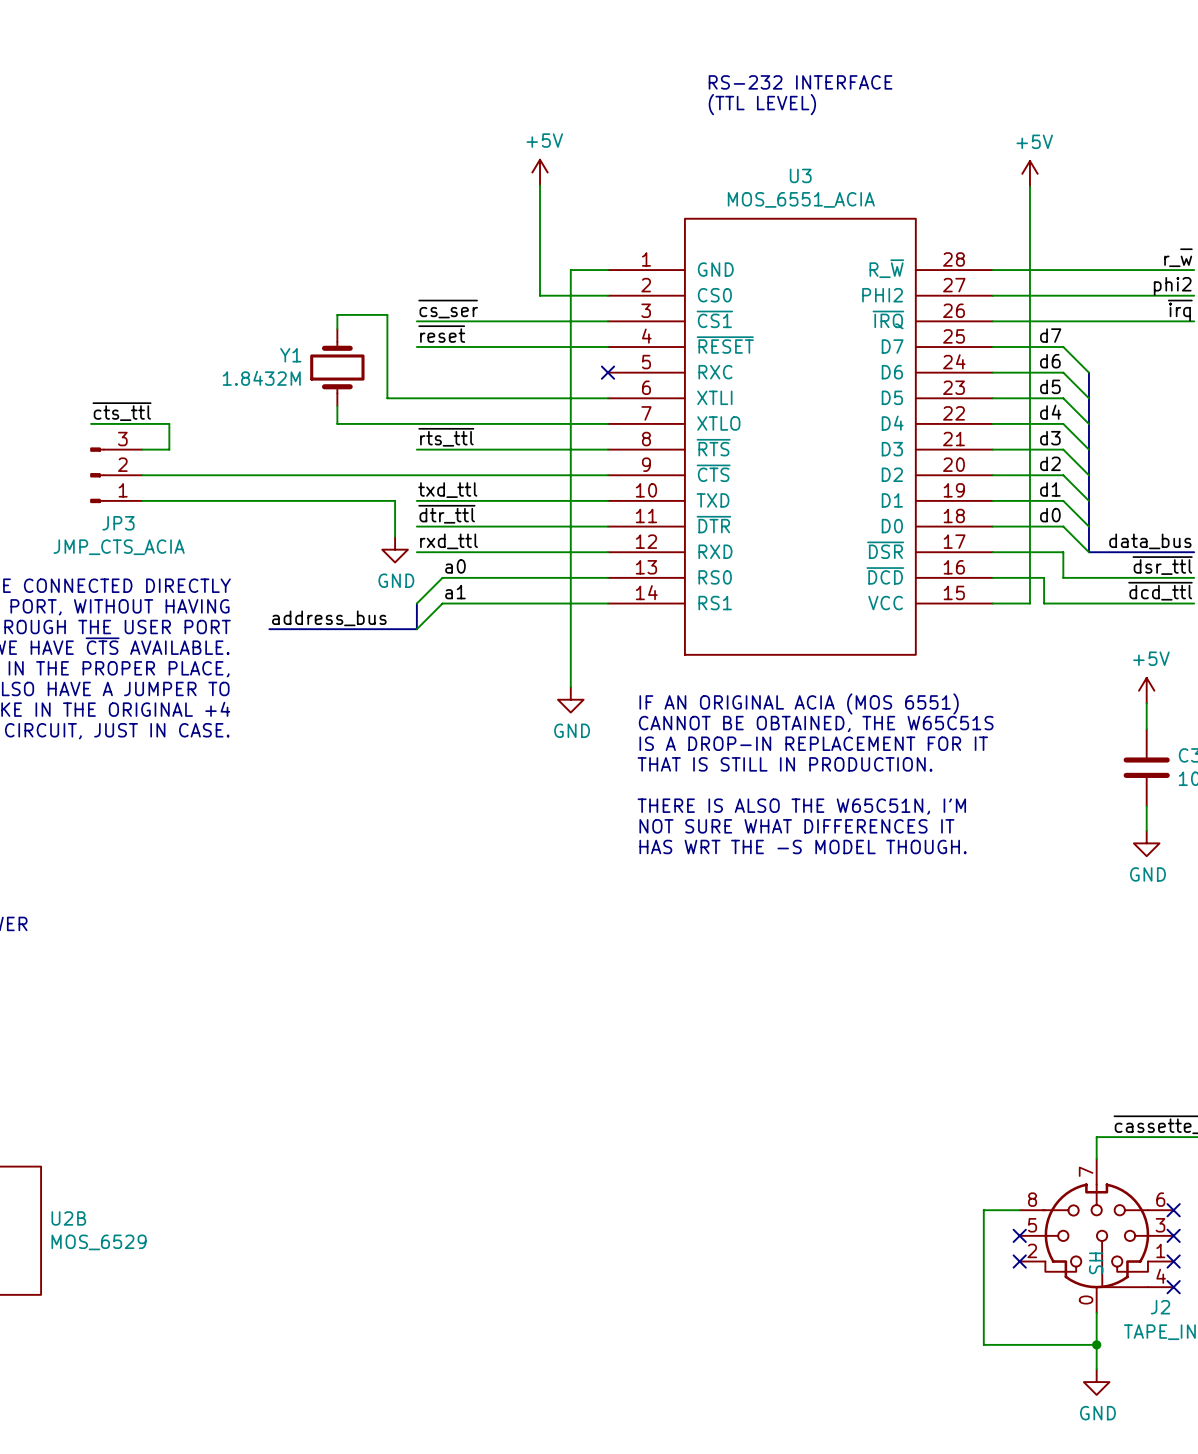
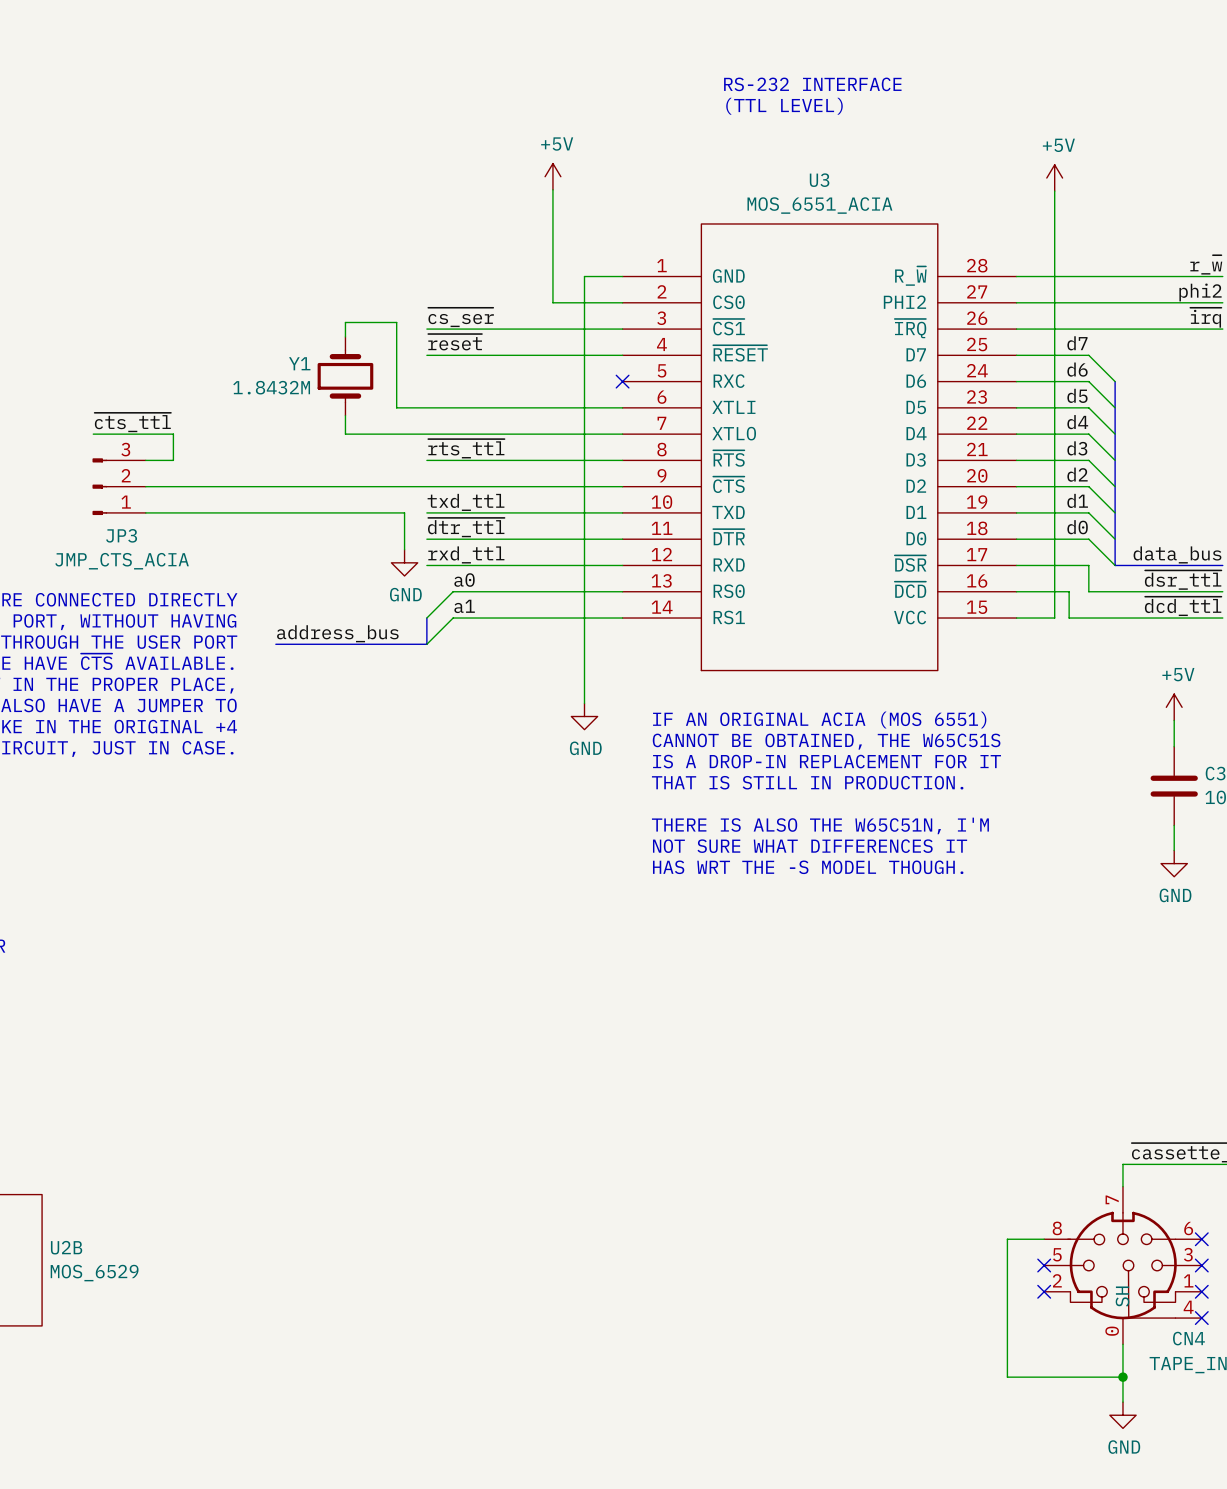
J2 name: J2 (1160, 1307) -> CN4 (1188, 1338)

